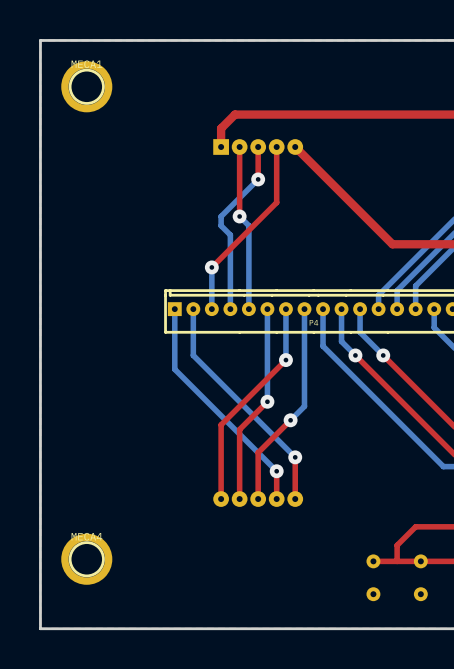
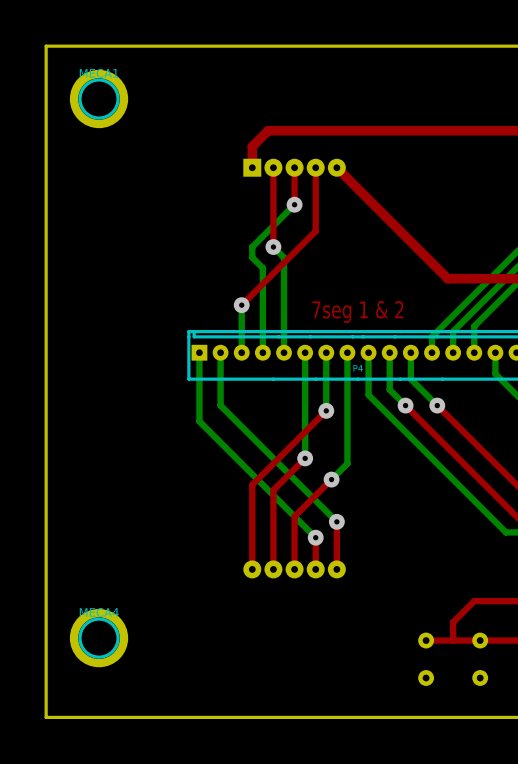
text: none -> 7seg 1 & 2 (357, 312)

